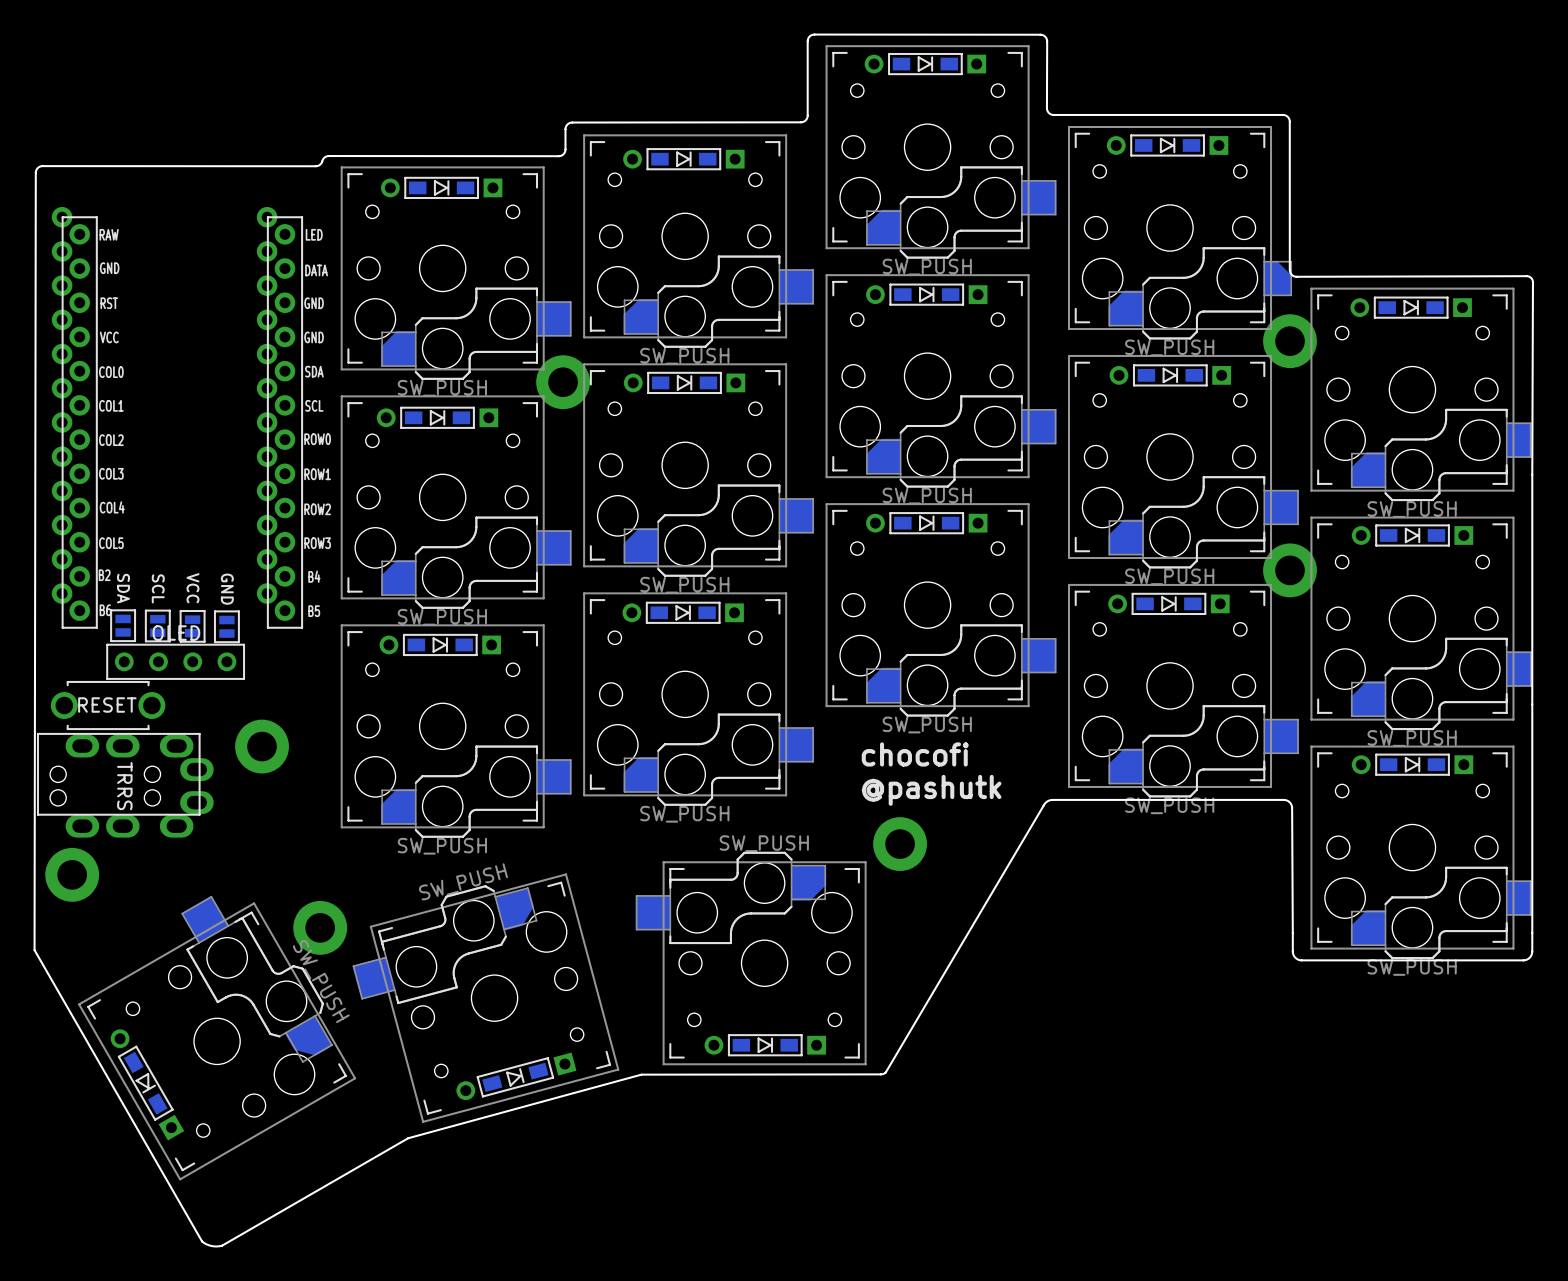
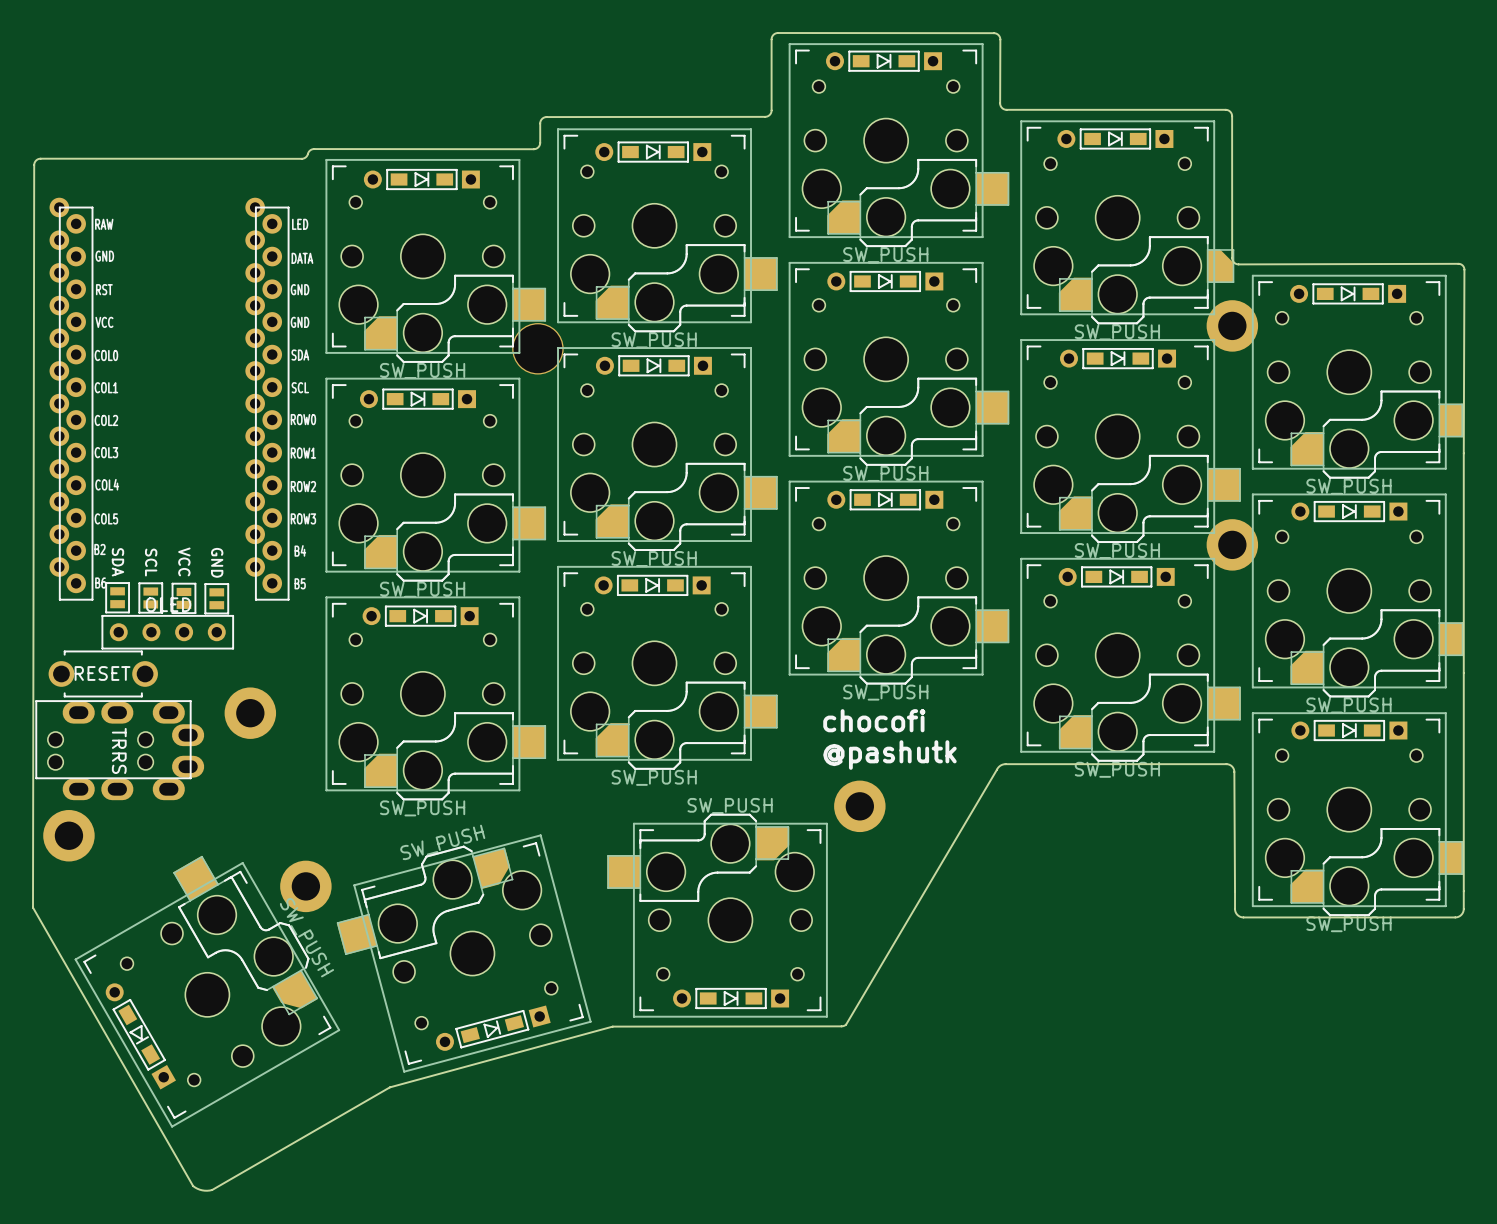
part: none -> (537, 348)
part: (563, 382) -> none

